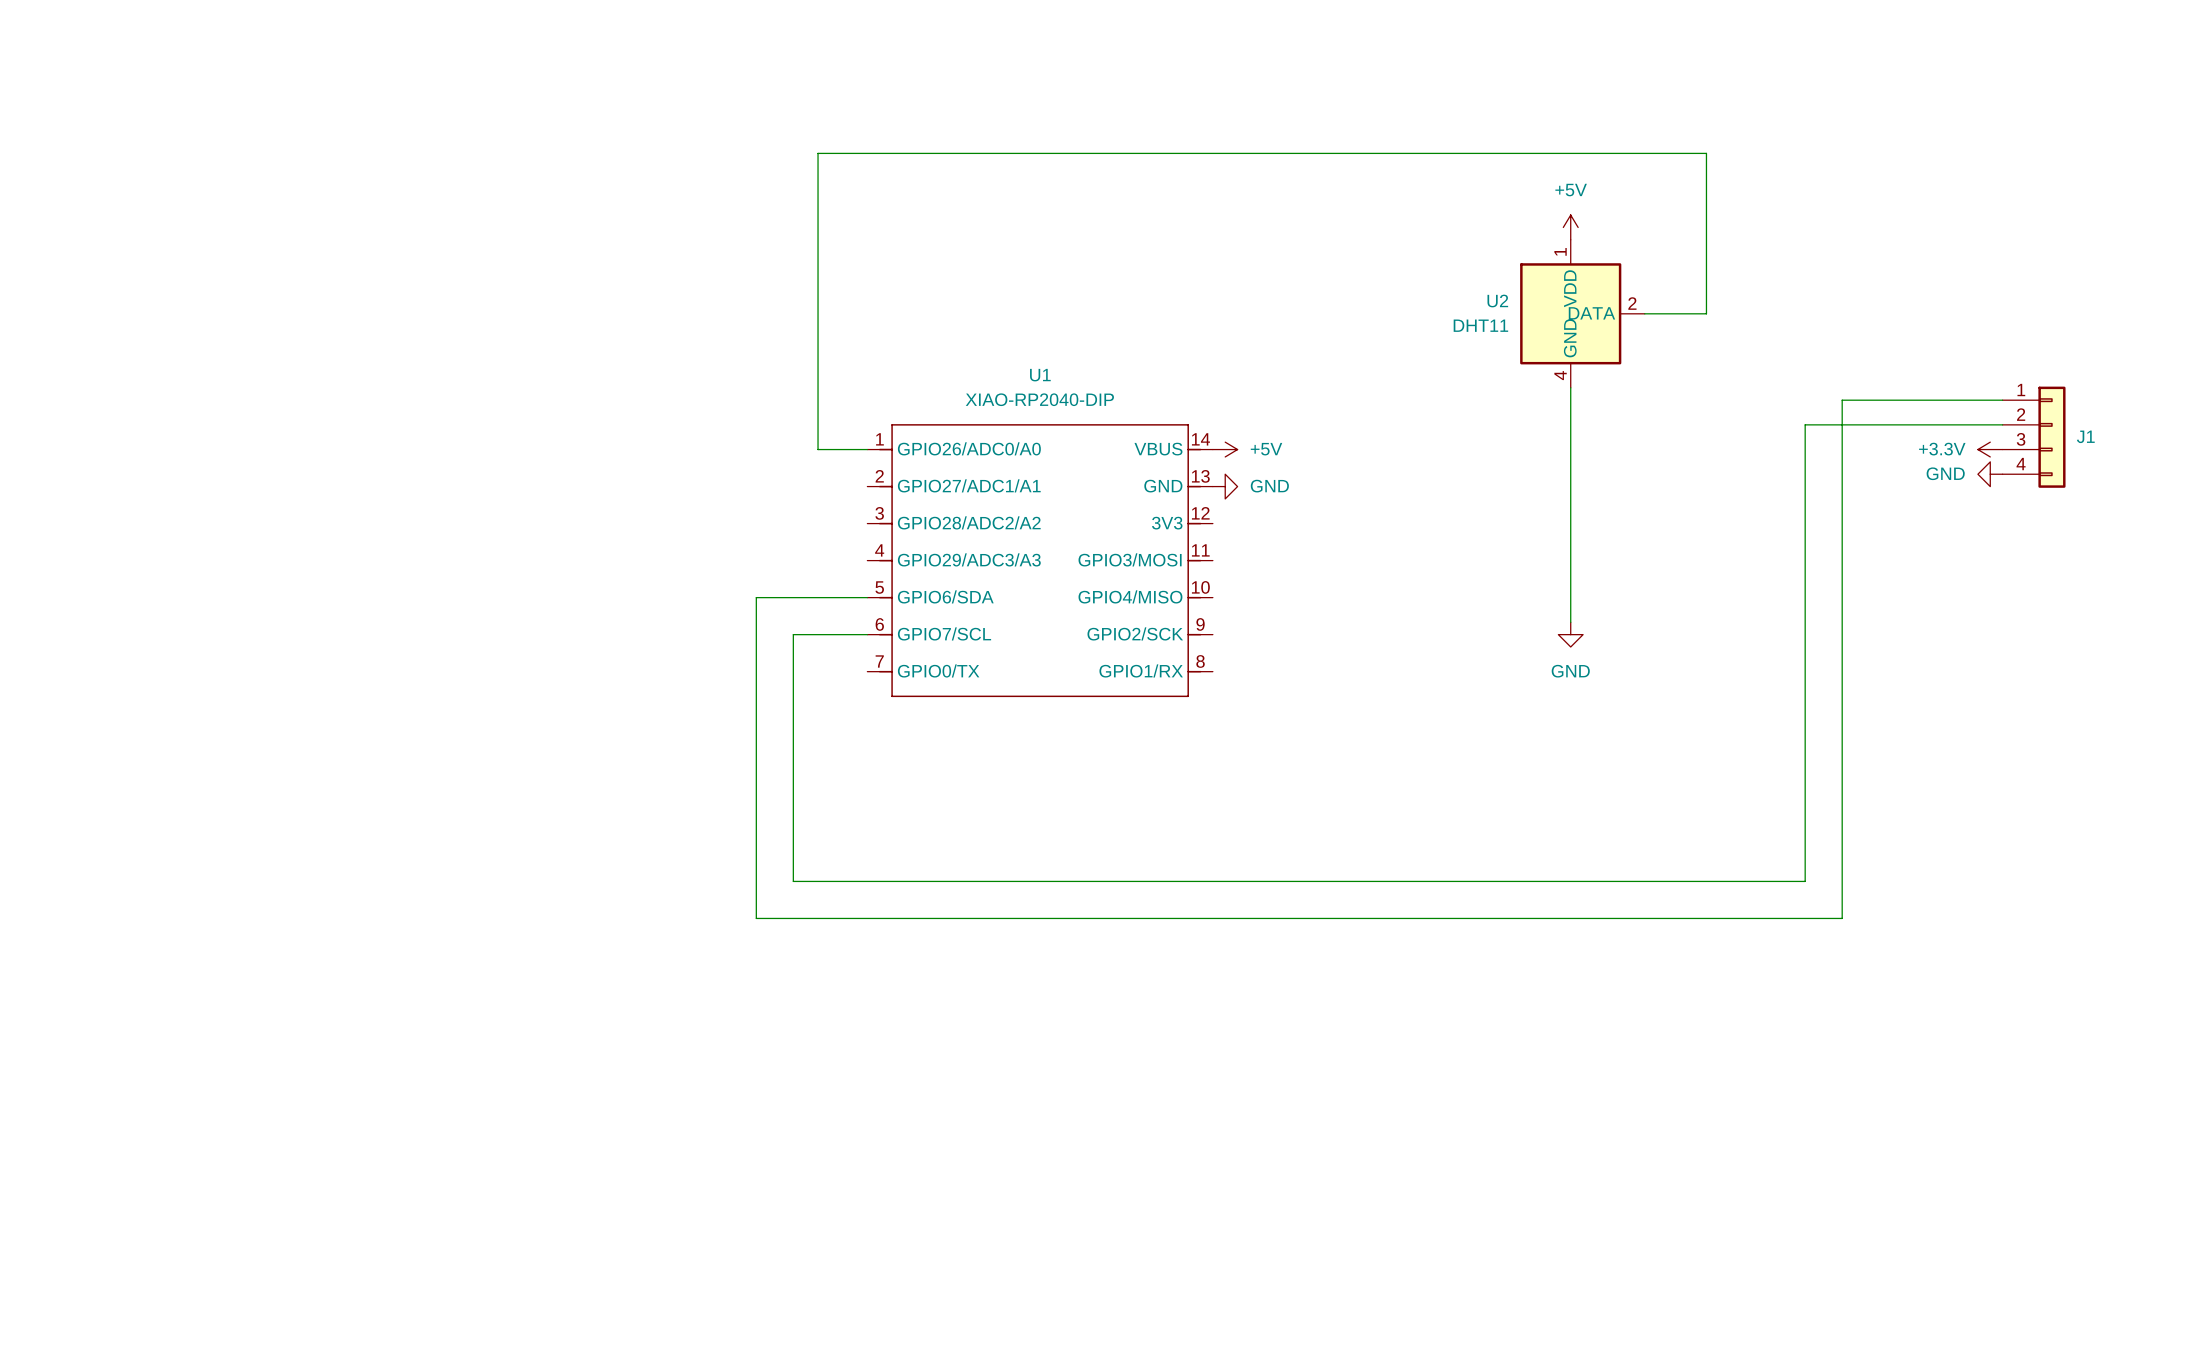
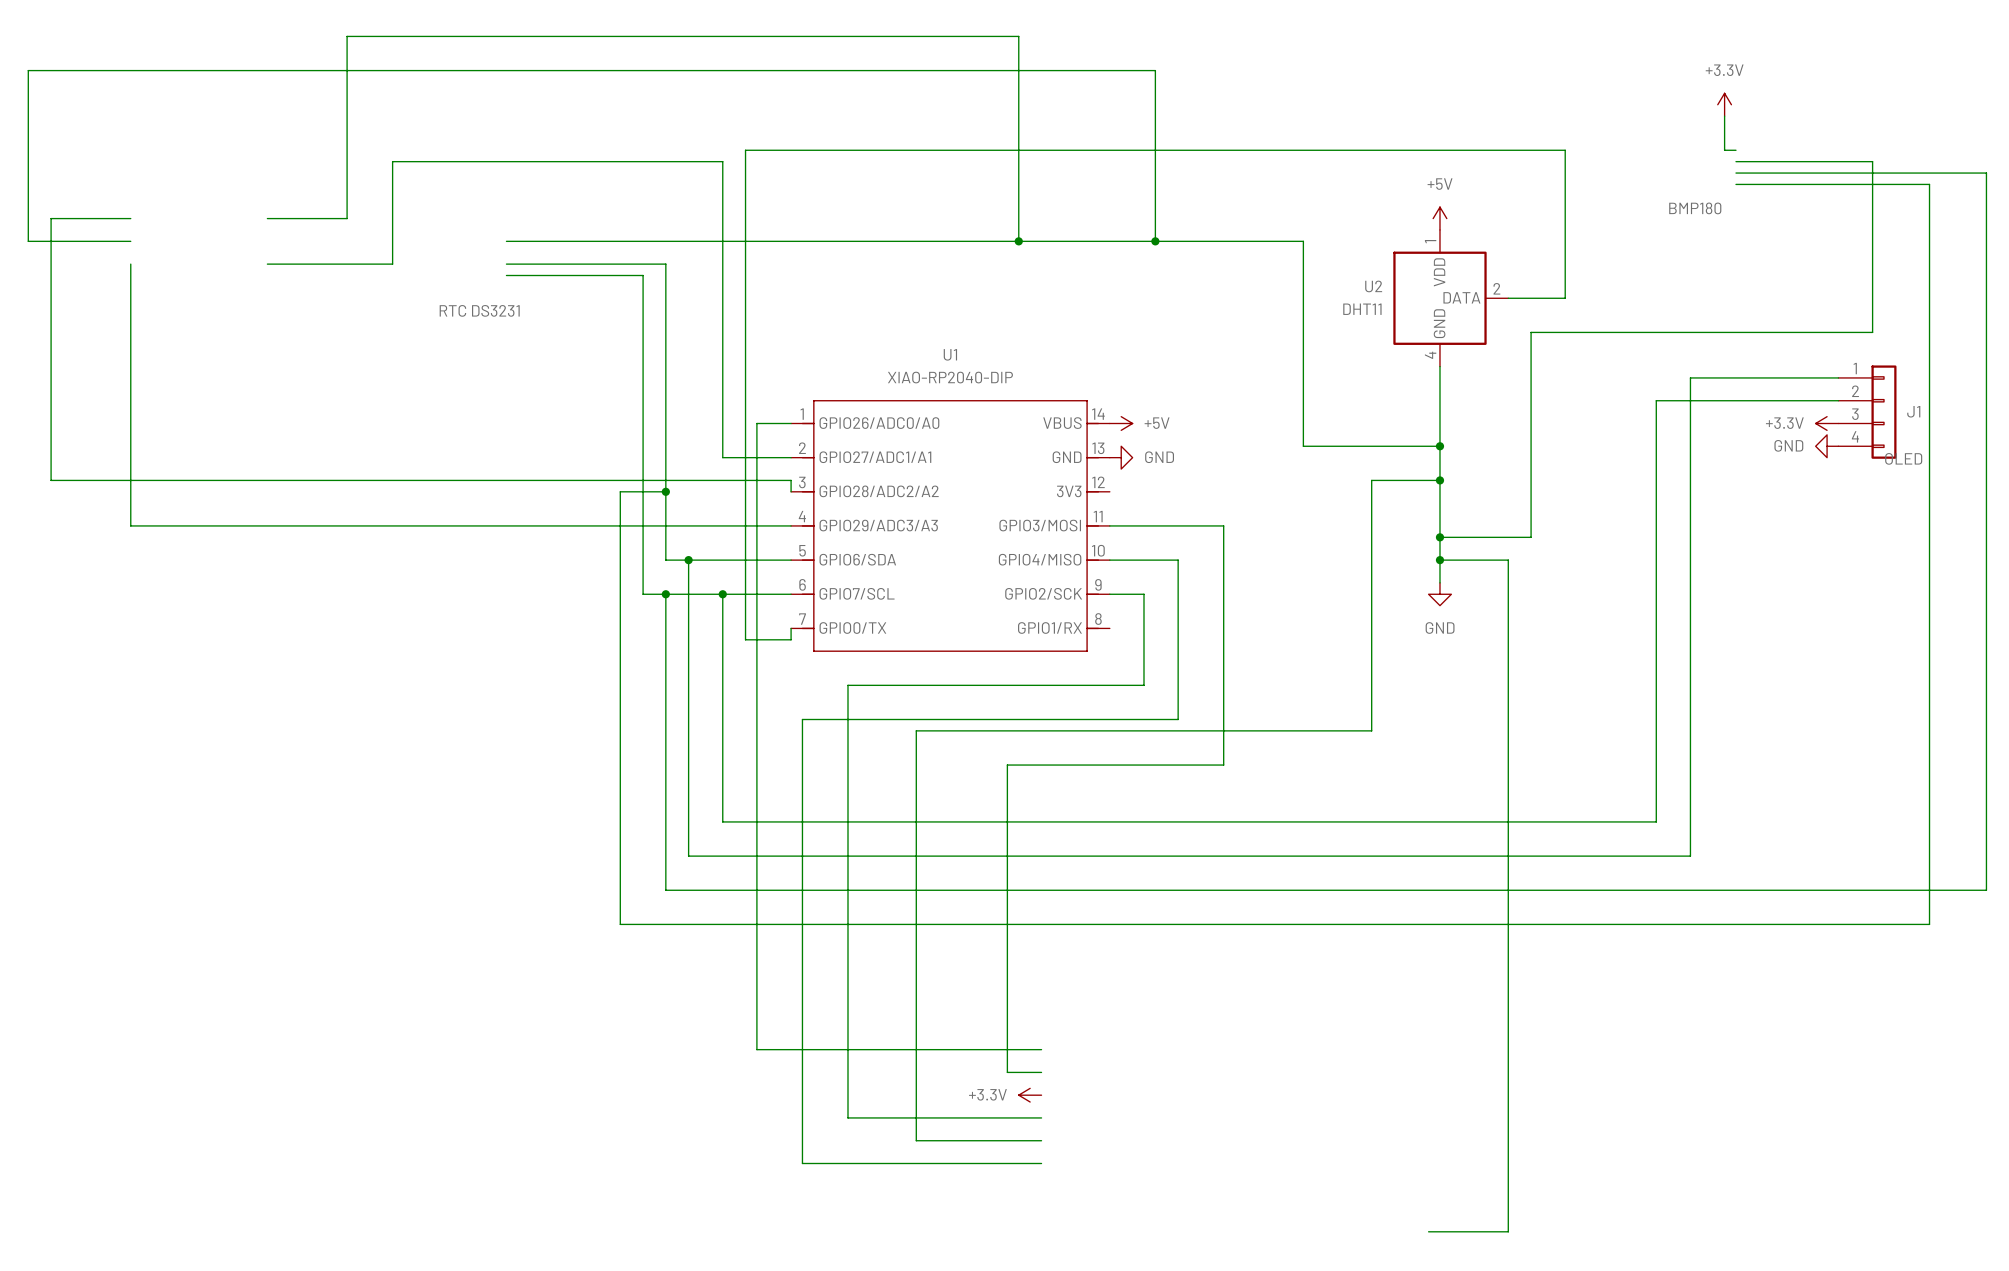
power symbol: none -> +3.3V (1724, 104)
wire: none -> (1724, 116) (1724, 150) (1735, 150)
wire: none -> (1735, 161) (1872, 161) (1872, 332) (1531, 332) (1531, 537) (1439, 537)
wire: none -> (1735, 173) (1986, 173) (1986, 890) (665, 890) (665, 594)
wire: none -> (1735, 184) (1929, 184) (1929, 924) (620, 924) (620, 491) (665, 491)
label: none -> BMP180 (1695, 208)
wire: none -> (130, 218) (51, 218) (51, 480) (791, 480) (791, 491)
wire: none -> (267, 218) (347, 218) (347, 36) (1018, 36) (1018, 241)
wire: none -> (130, 241) (28, 241) (28, 70) (1155, 70) (1155, 241)
wire: none -> (506, 241) (1303, 241) (1303, 446) (1439, 446)
junction: none -> (1018, 241)
junction: none -> (1155, 241)
wire: none -> (130, 264) (130, 525) (791, 525)
wire: none -> (267, 264) (392, 264) (392, 161) (722, 161) (722, 457) (791, 457)
wire: none -> (506, 264) (665, 264) (665, 560) (688, 560)
wire: none -> (506, 275) (643, 275) (643, 594) (722, 594)
label: none -> RTC DS3231 (479, 310)
wire: (818, 449) (830, 449) -> (745, 423) (745, 639) (791, 639) (791, 628)
wire: none -> (756, 423) (756, 1049) (1041, 1049)
junction: none -> (1439, 446)
label: none -> OLED (1903, 458)
wire: none -> (1439, 480) (1371, 480) (1371, 730) (916, 730) (916, 1140) (1041, 1140)
junction: none -> (1439, 480)
junction: none -> (665, 491)
wire: none -> (1109, 525) (1223, 525) (1223, 765) (1007, 765) (1007, 1072) (1041, 1072)
junction: none -> (1439, 537)
junction: none -> (688, 560)
wire: none -> (1109, 560) (1178, 560) (1178, 719) (802, 719) (802, 1163) (1041, 1163)
wire: none -> (1439, 560) (1508, 560) (1508, 1231) (1428, 1231)
junction: none -> (1439, 560)
junction: none -> (665, 594)
junction: none -> (722, 594)
wire: none -> (1109, 594) (1143, 594) (1143, 685) (847, 685) (847, 1117) (1041, 1117)
power symbol: none -> +3.3V (1030, 1095)

